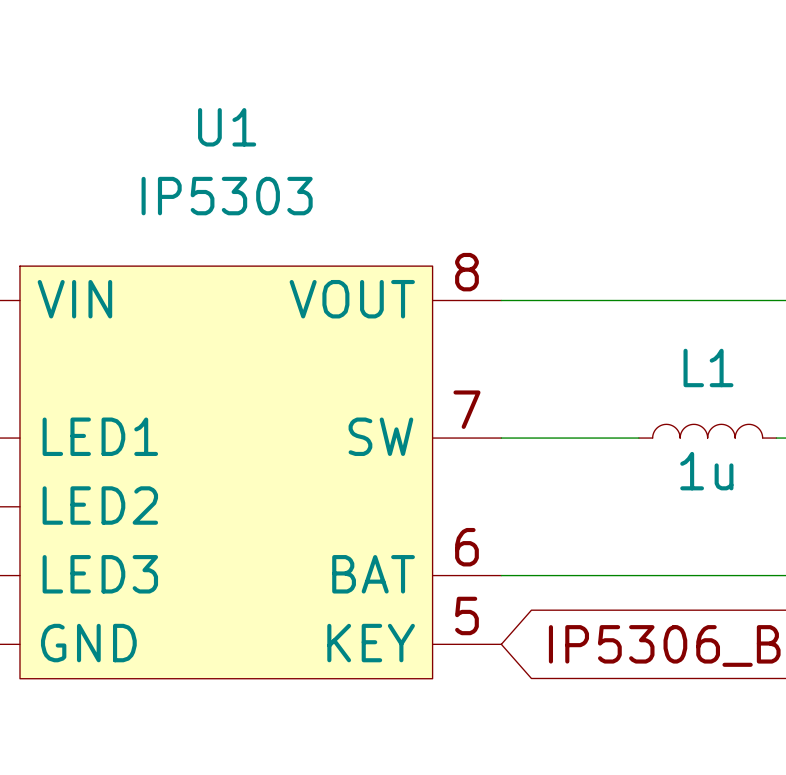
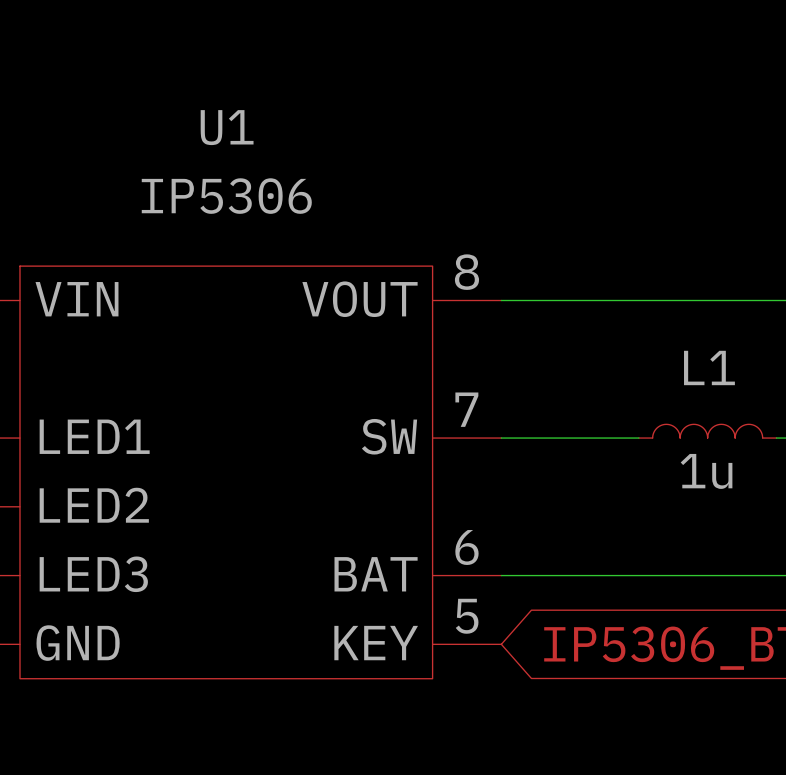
U1 value: IP5303 (227, 196) -> IP5306 (226, 196)

